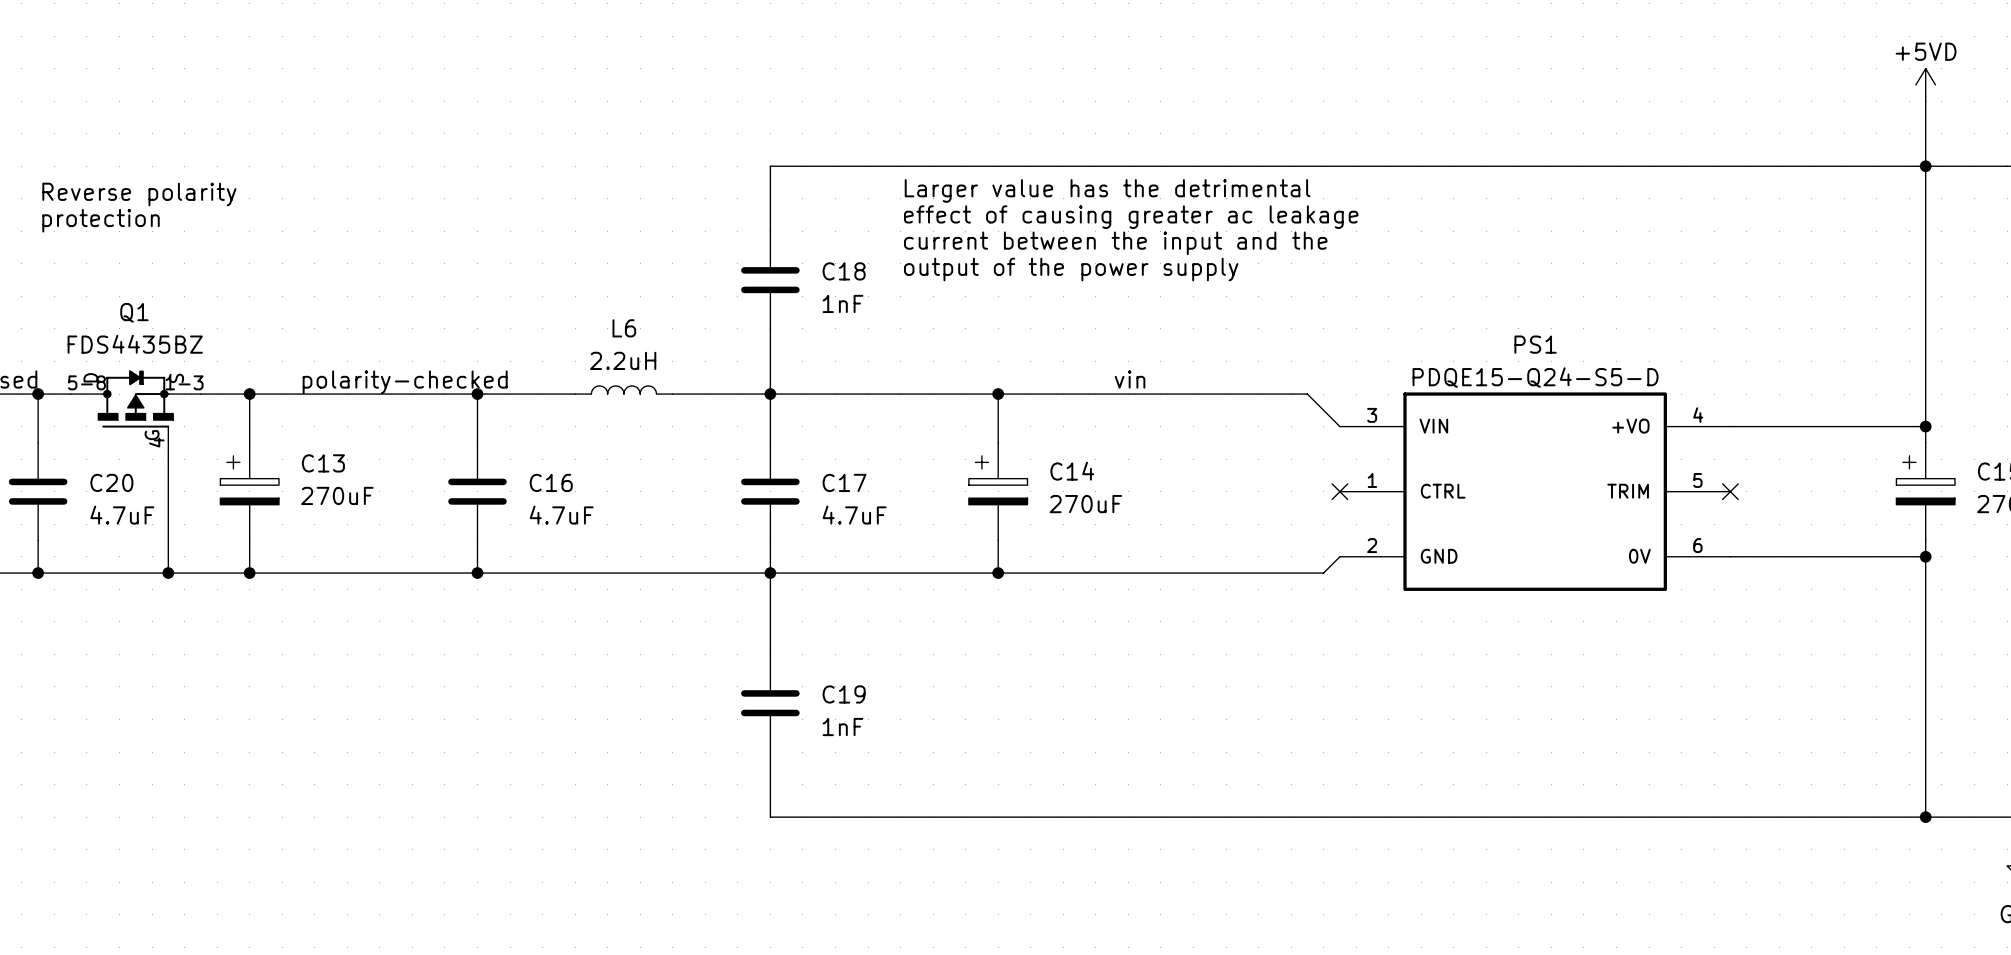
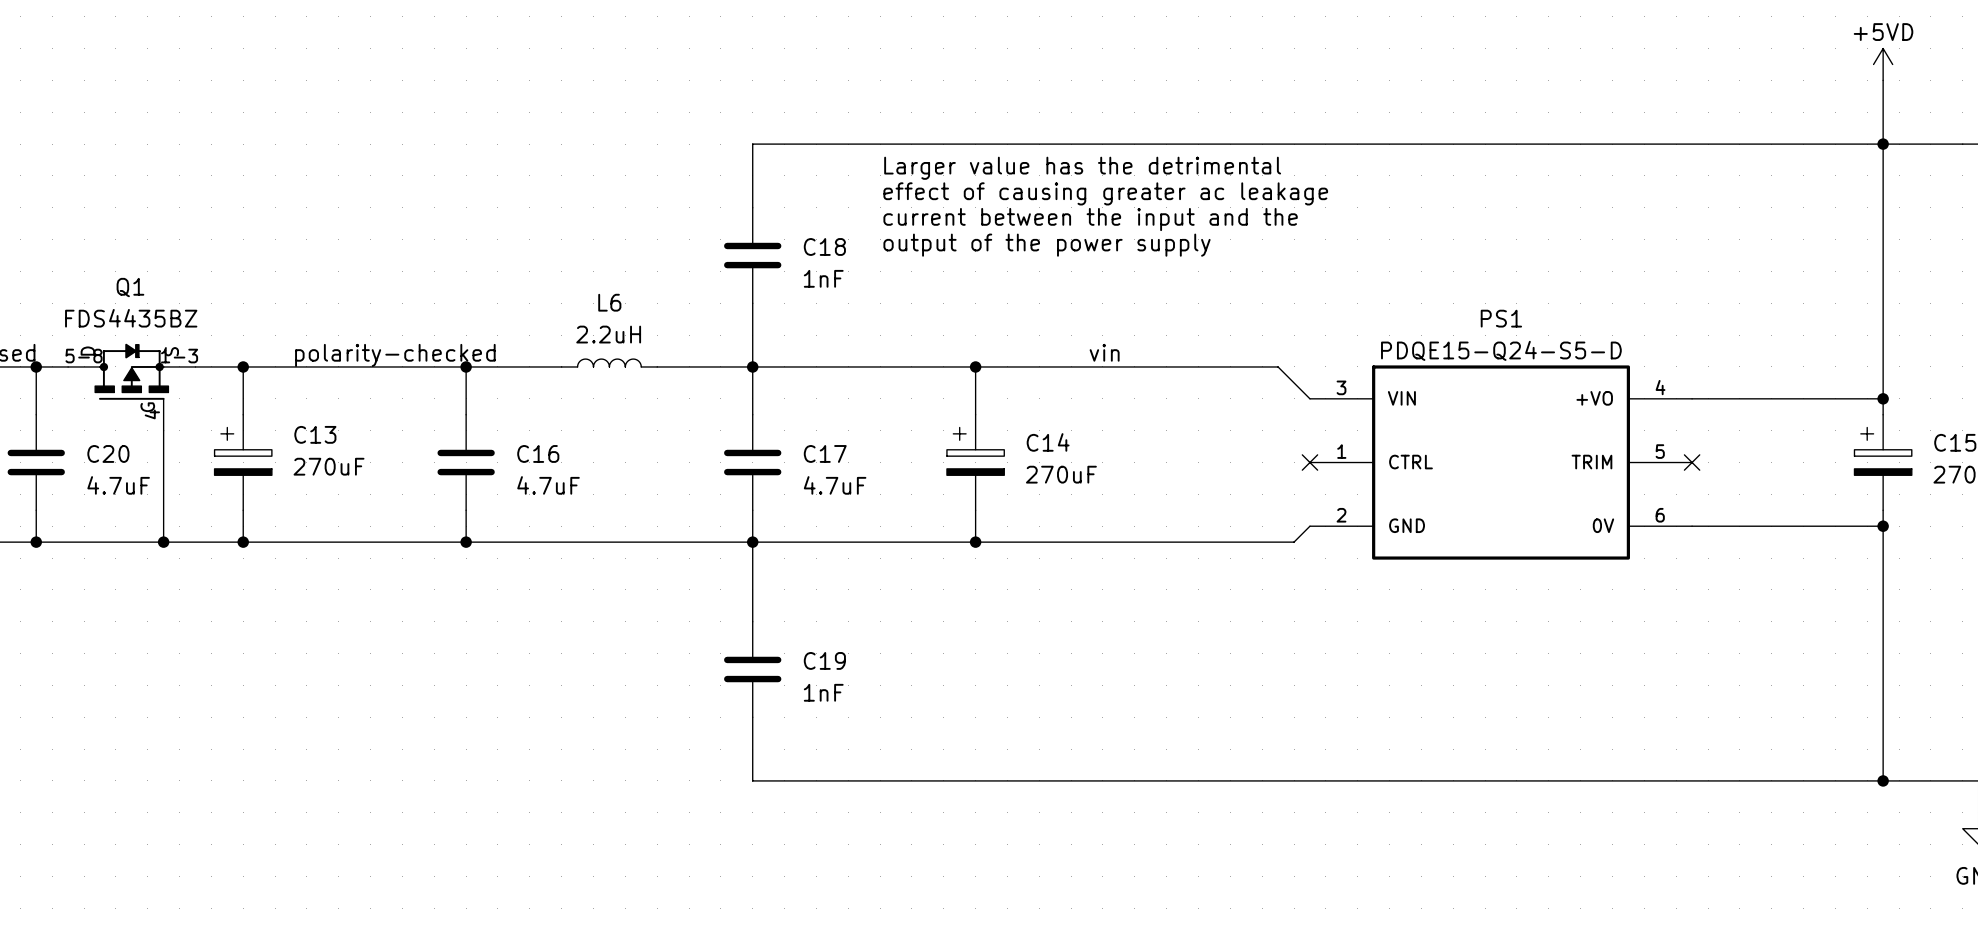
text: Reverse polarity (139, 194) -> none
text: protection (101, 220) -> none

